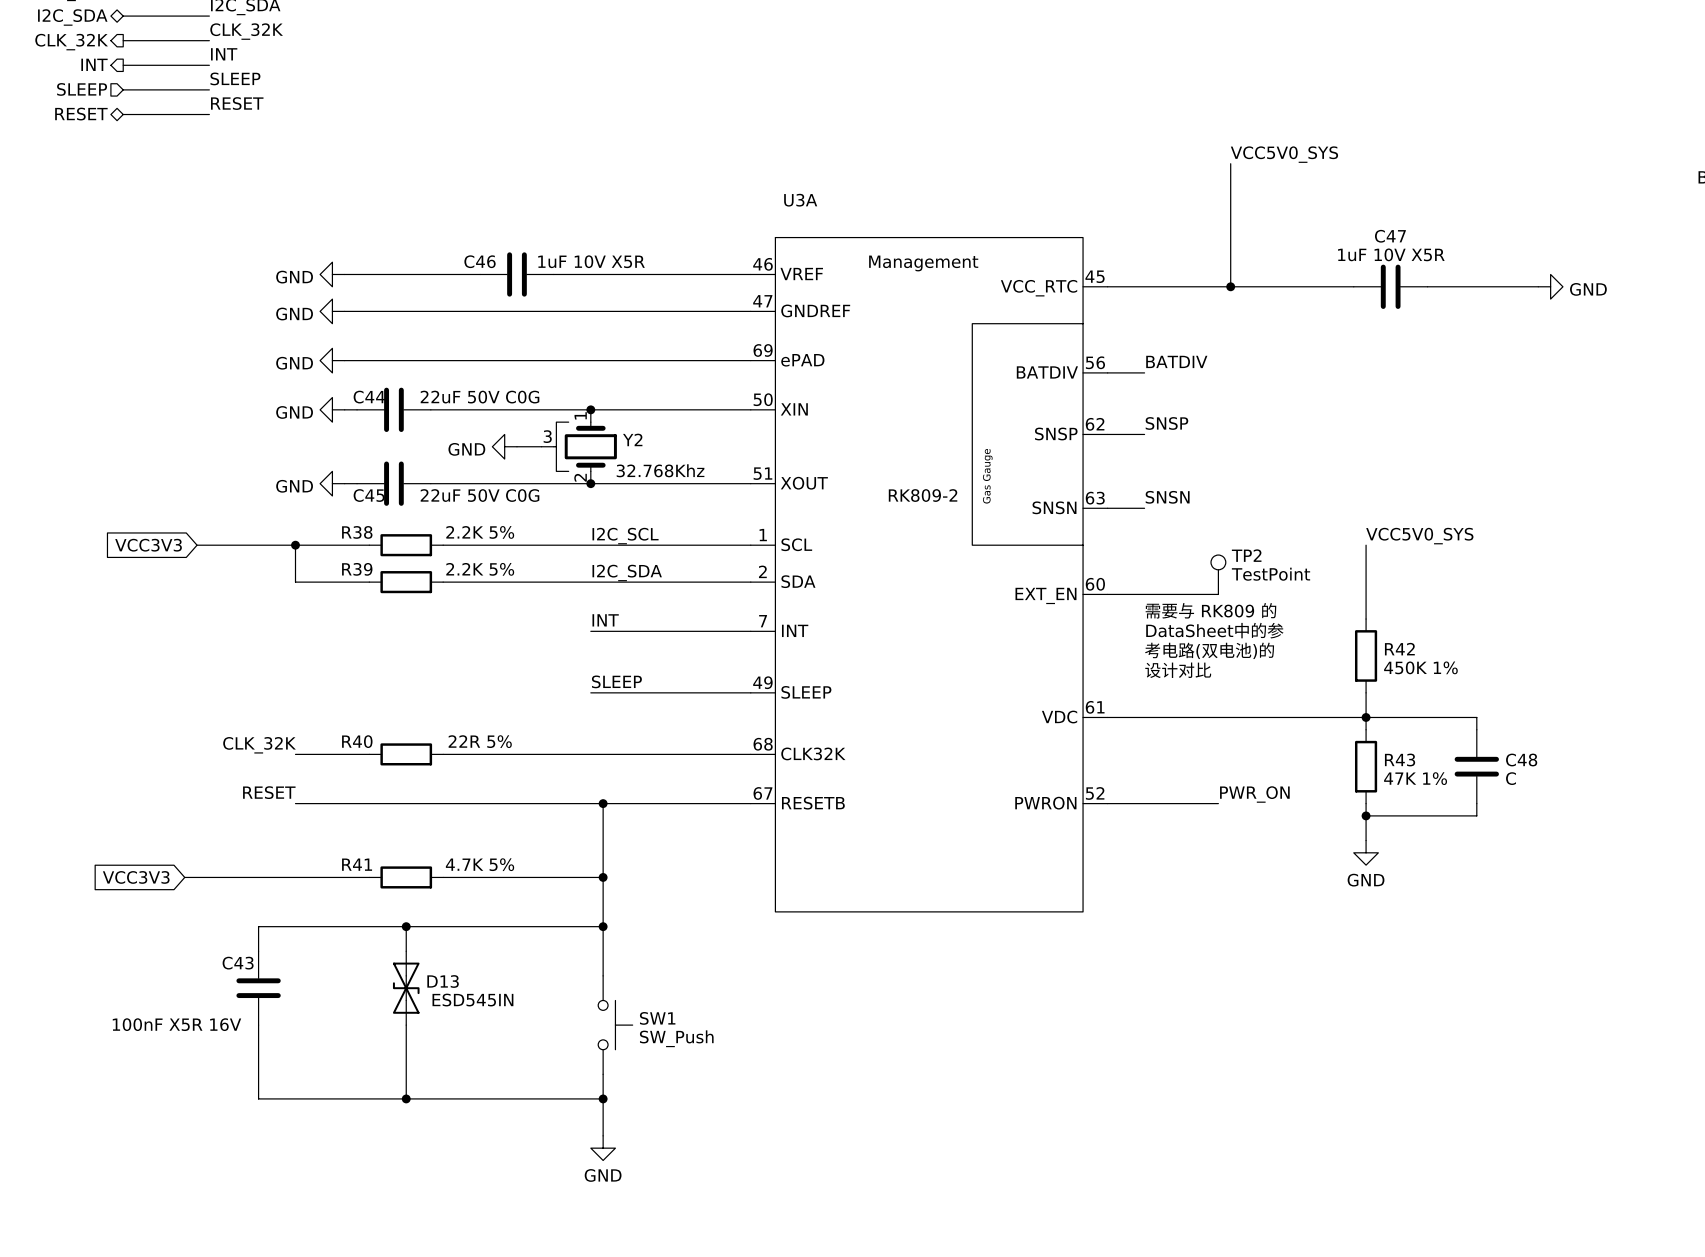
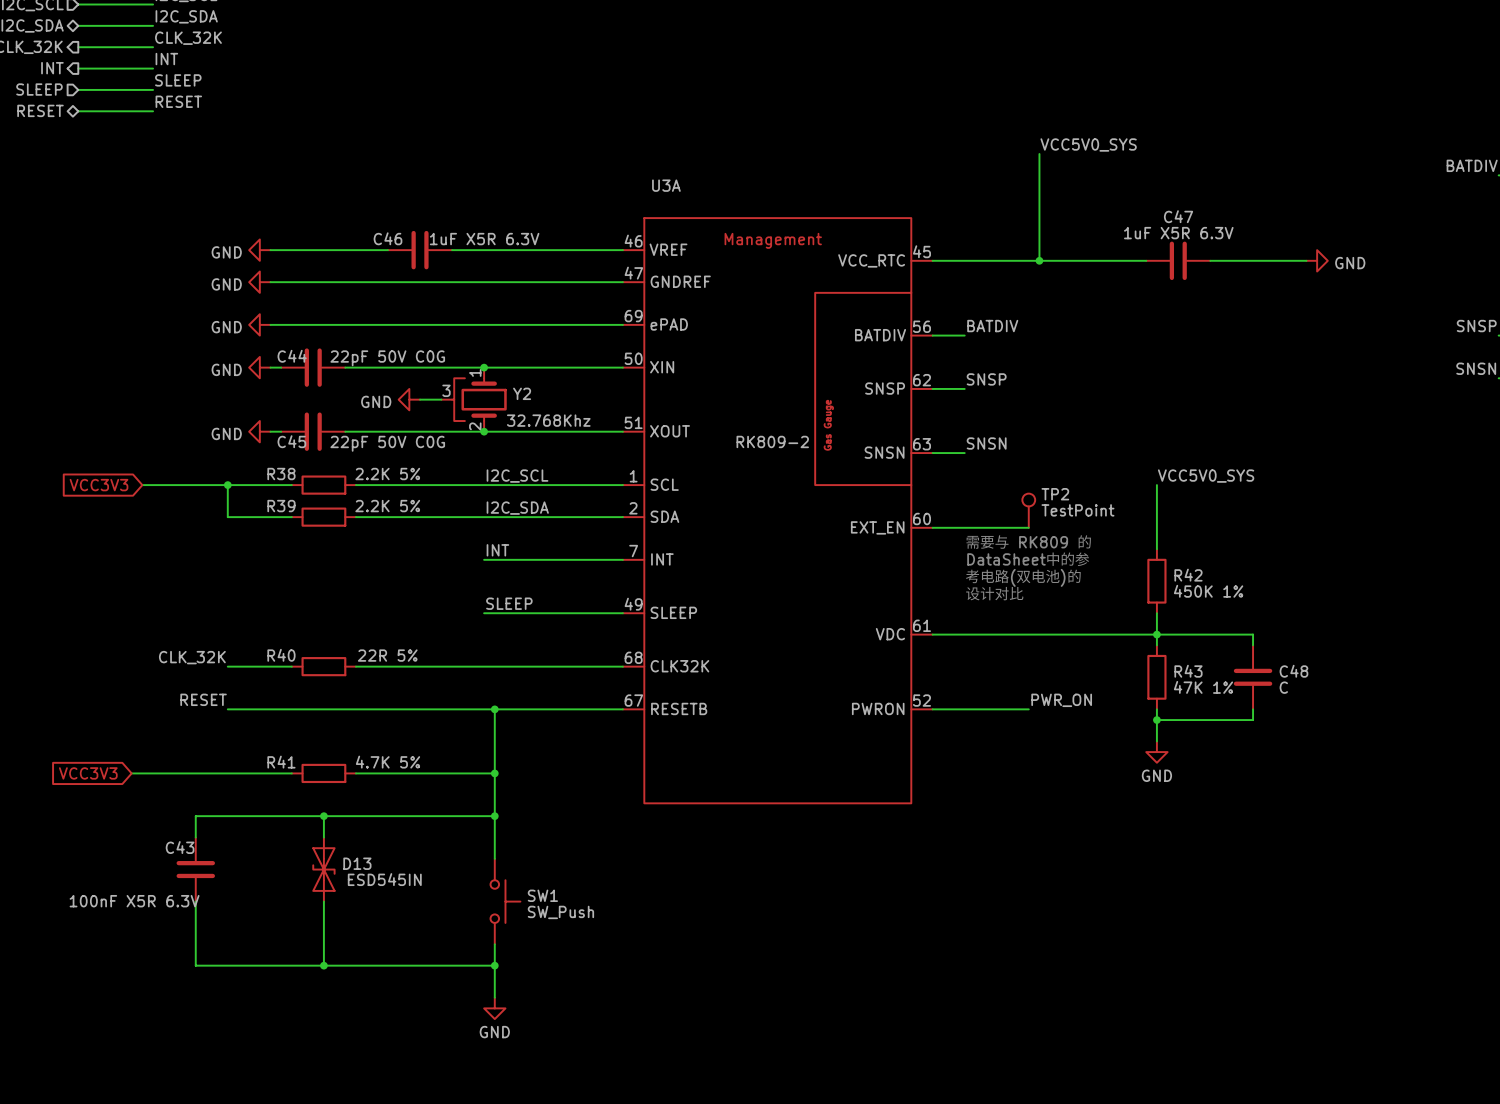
C47 value: 1uF 10V X5R (1391, 254) -> 1uF X5R 6.3V (1178, 233)
C46 value: 1uF 10V X5R (591, 261) -> 1uF X5R 6.3V (484, 239)
C44 value: 22uF 50V C0G (480, 397) -> 22pF 50V C0G (387, 358)
C45 value: 22uF 50V C0G (480, 495) -> 22pF 50V C0G (387, 443)
C43 value: 100nF X5R 16V (176, 1024) -> 100nF X5R 6.3V (134, 901)

